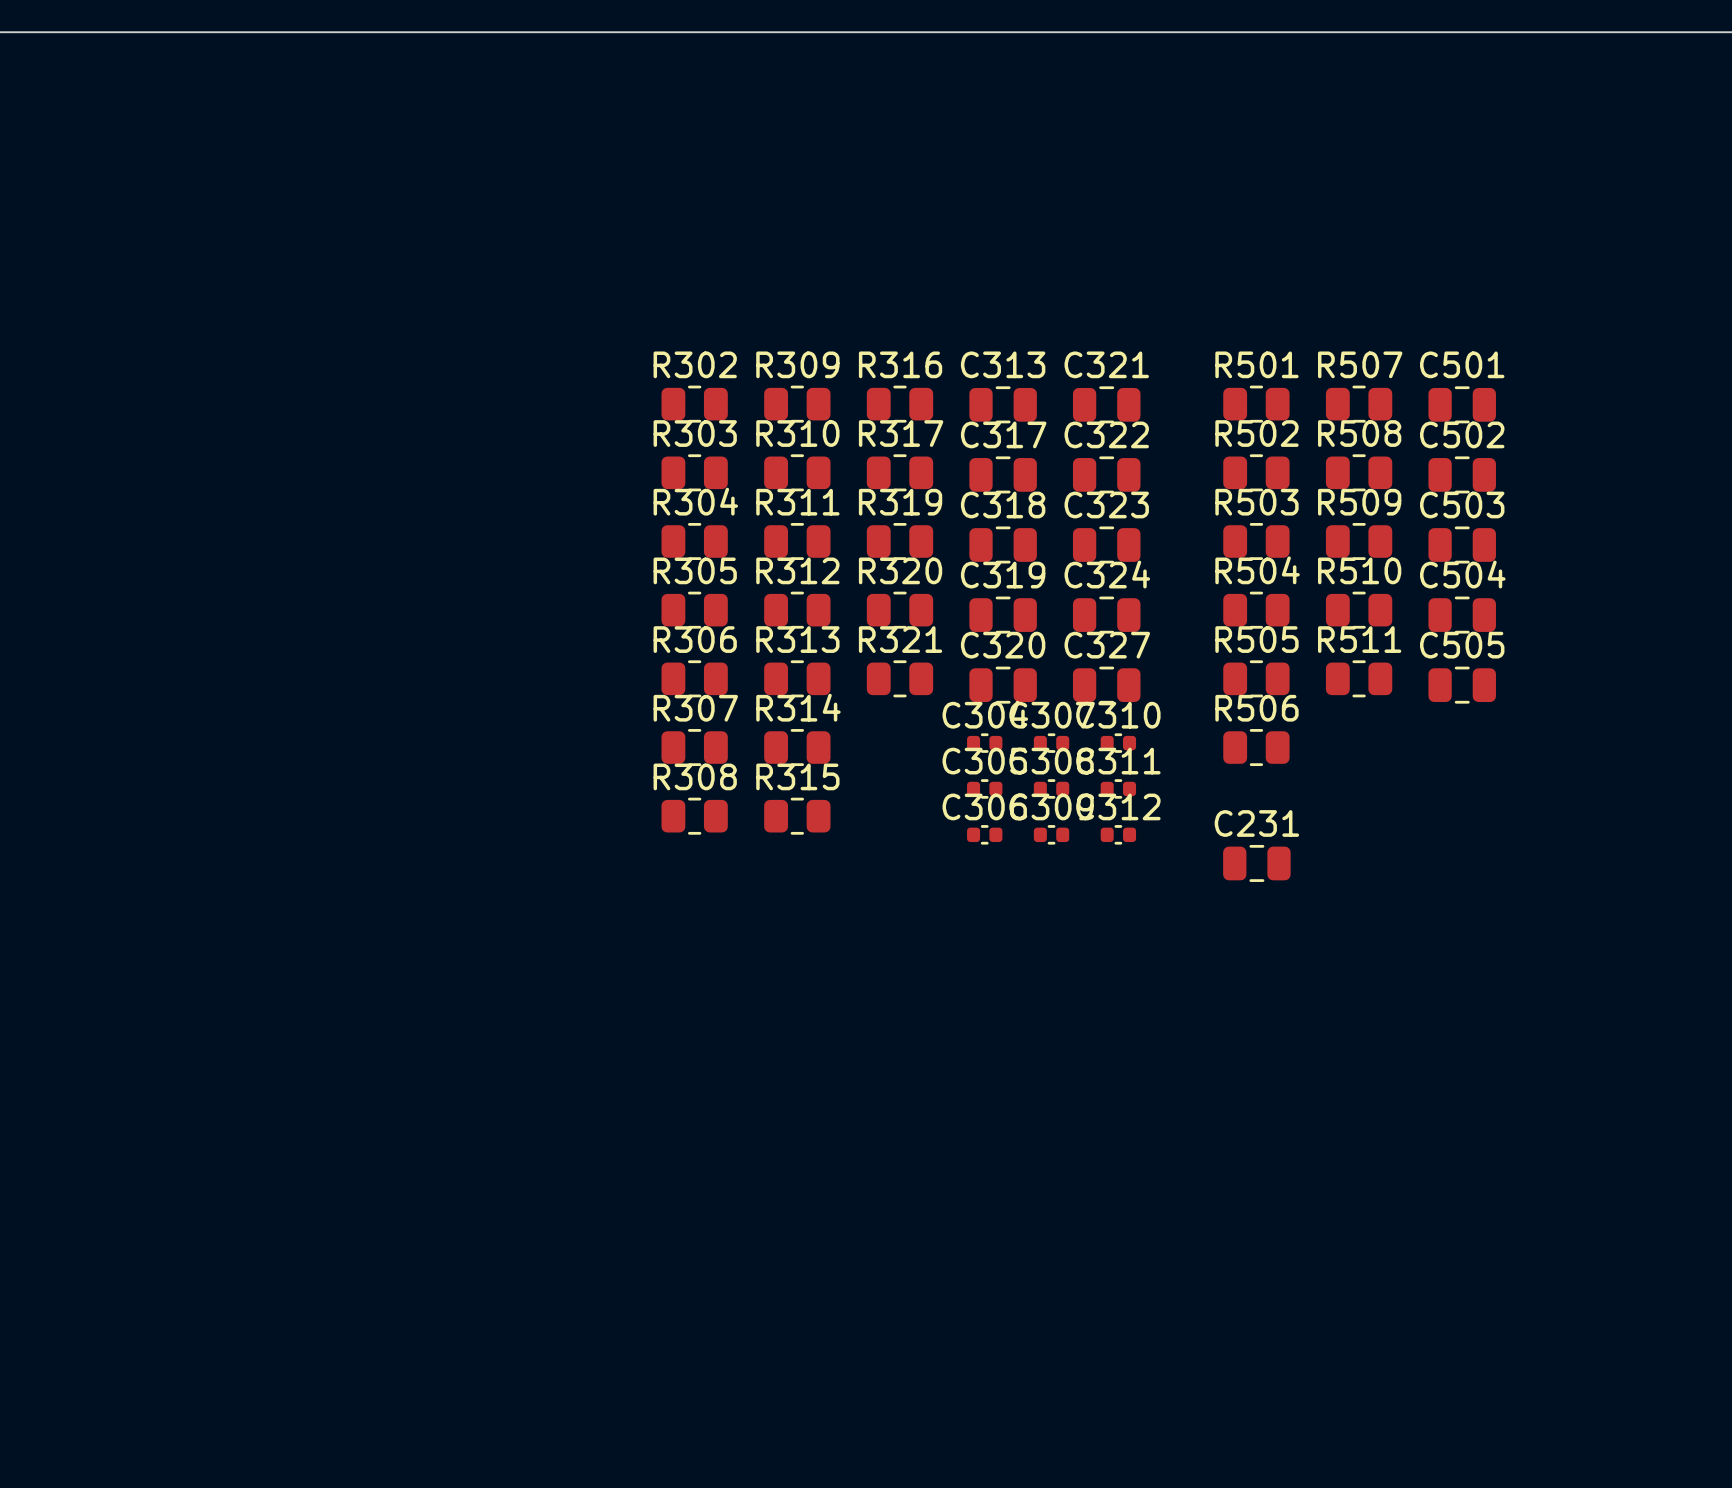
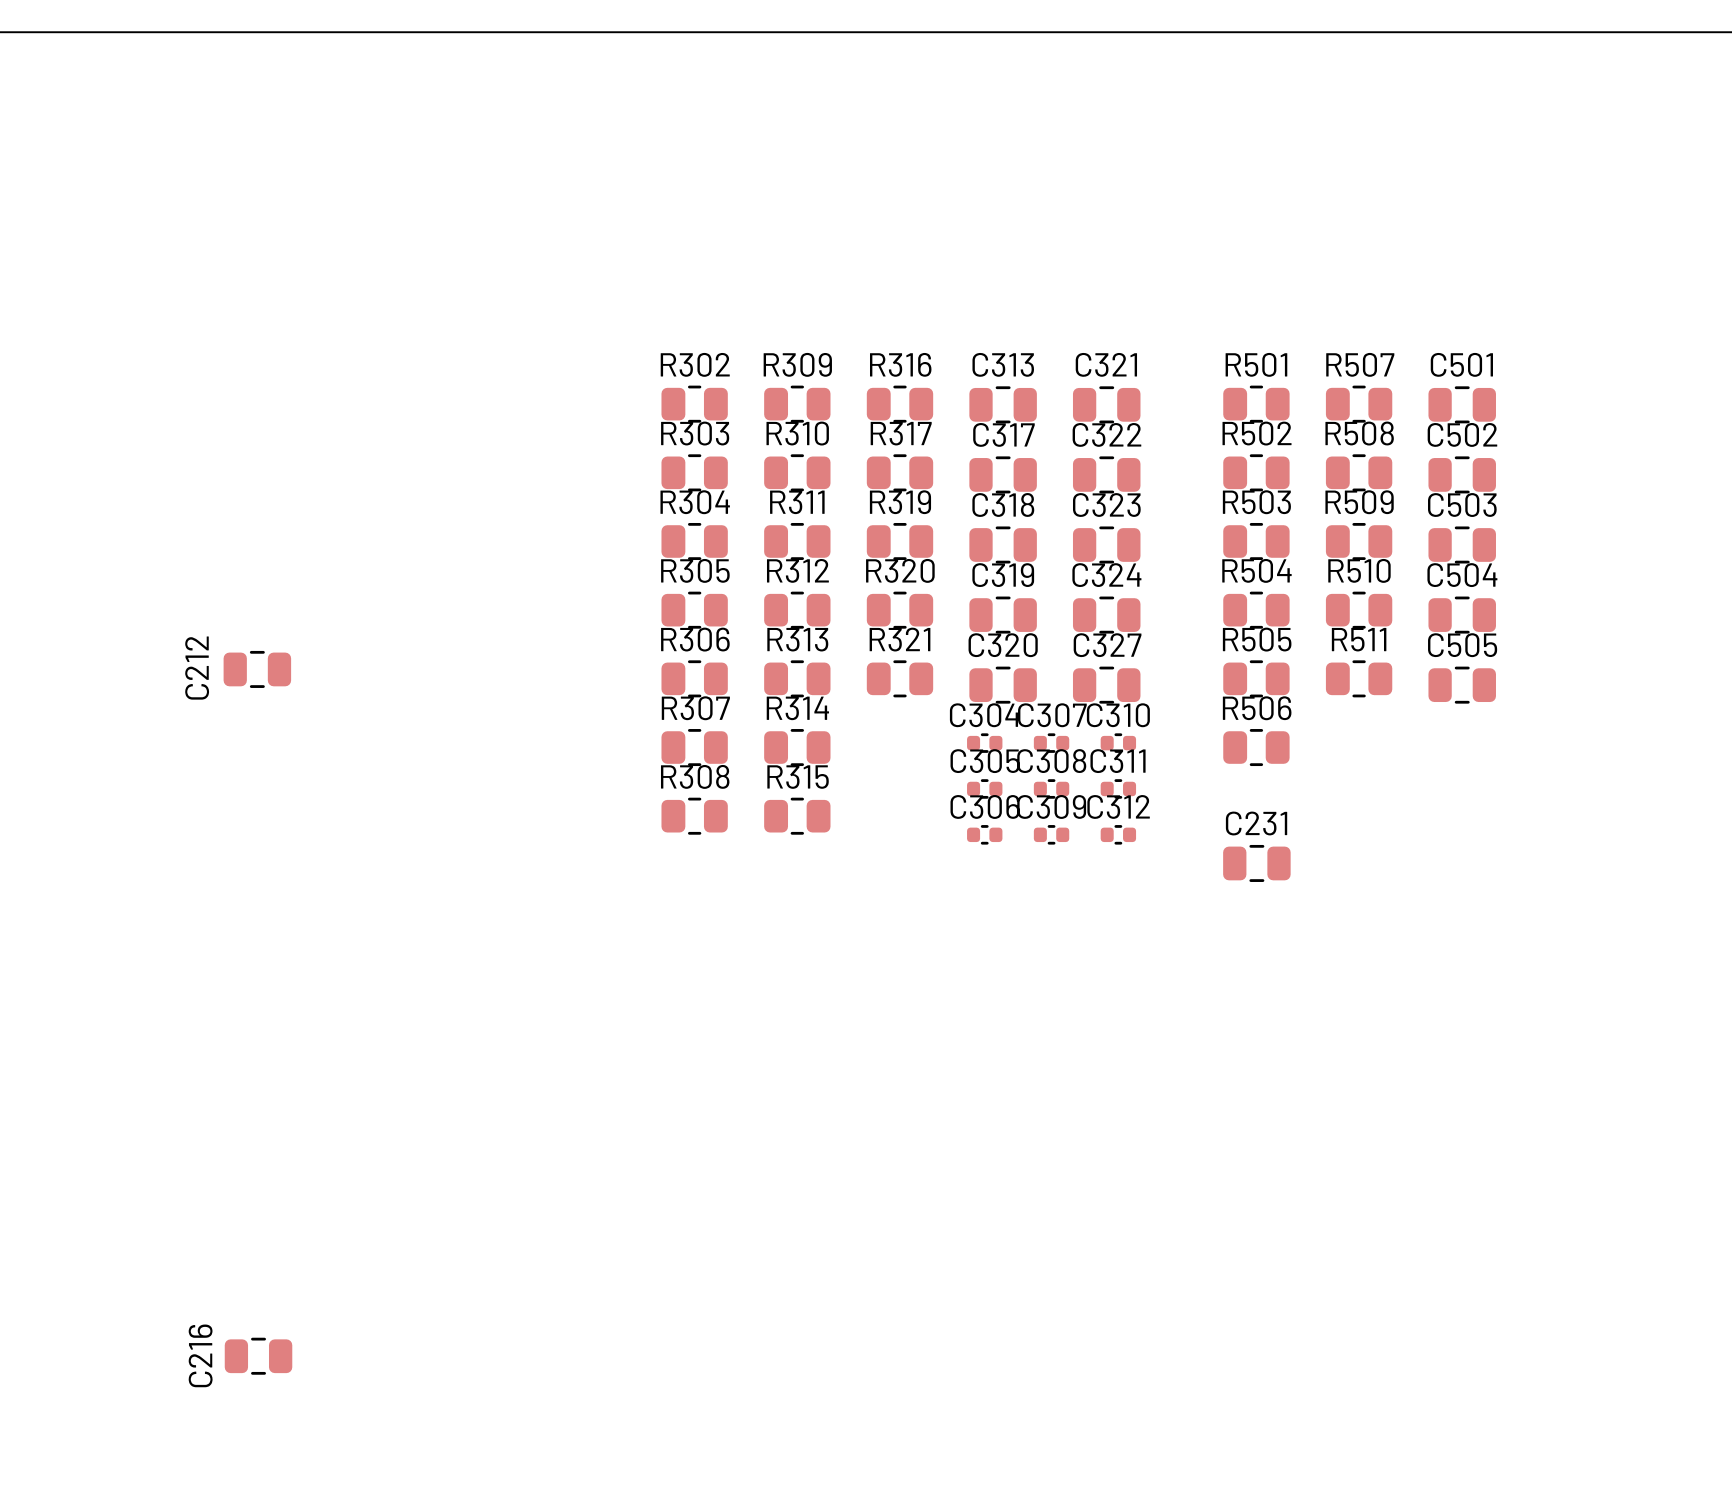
C212: none -> (257, 669)
C216: none -> (258, 1356)

